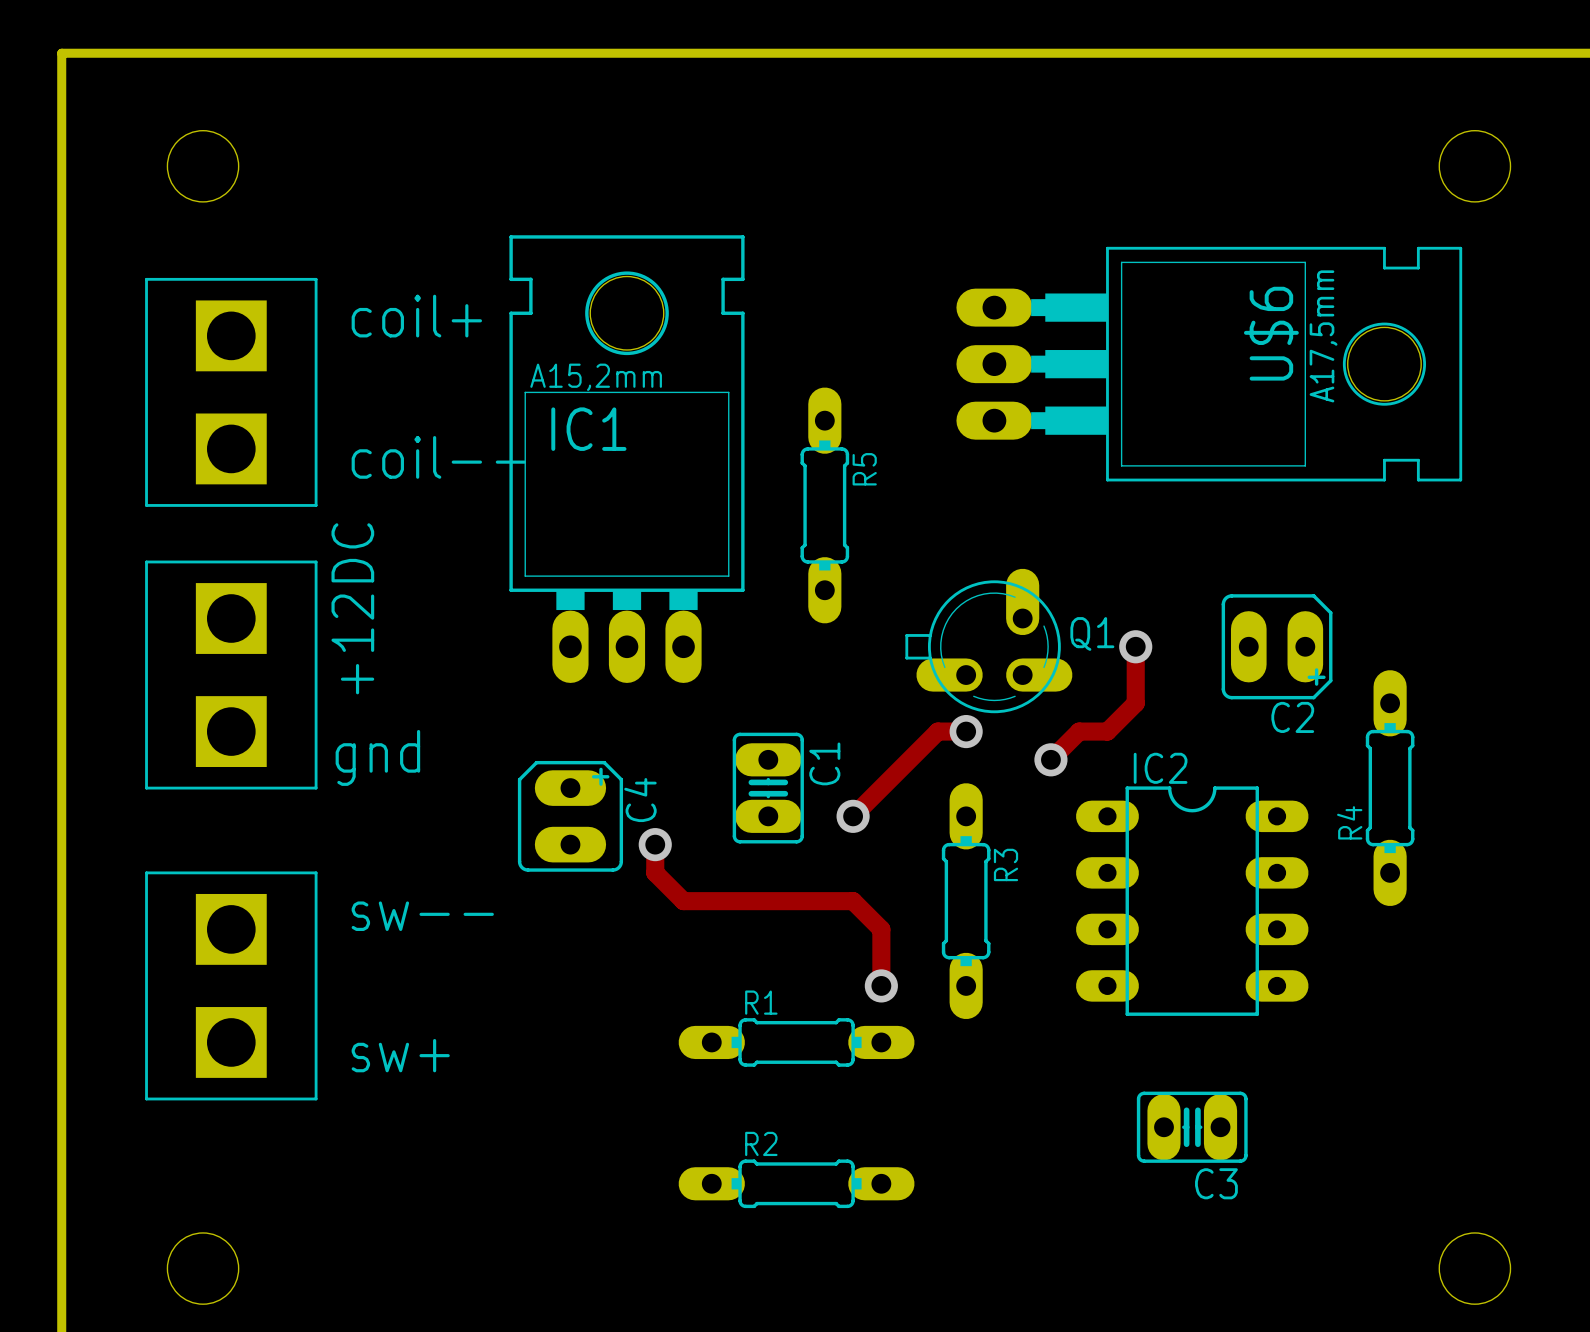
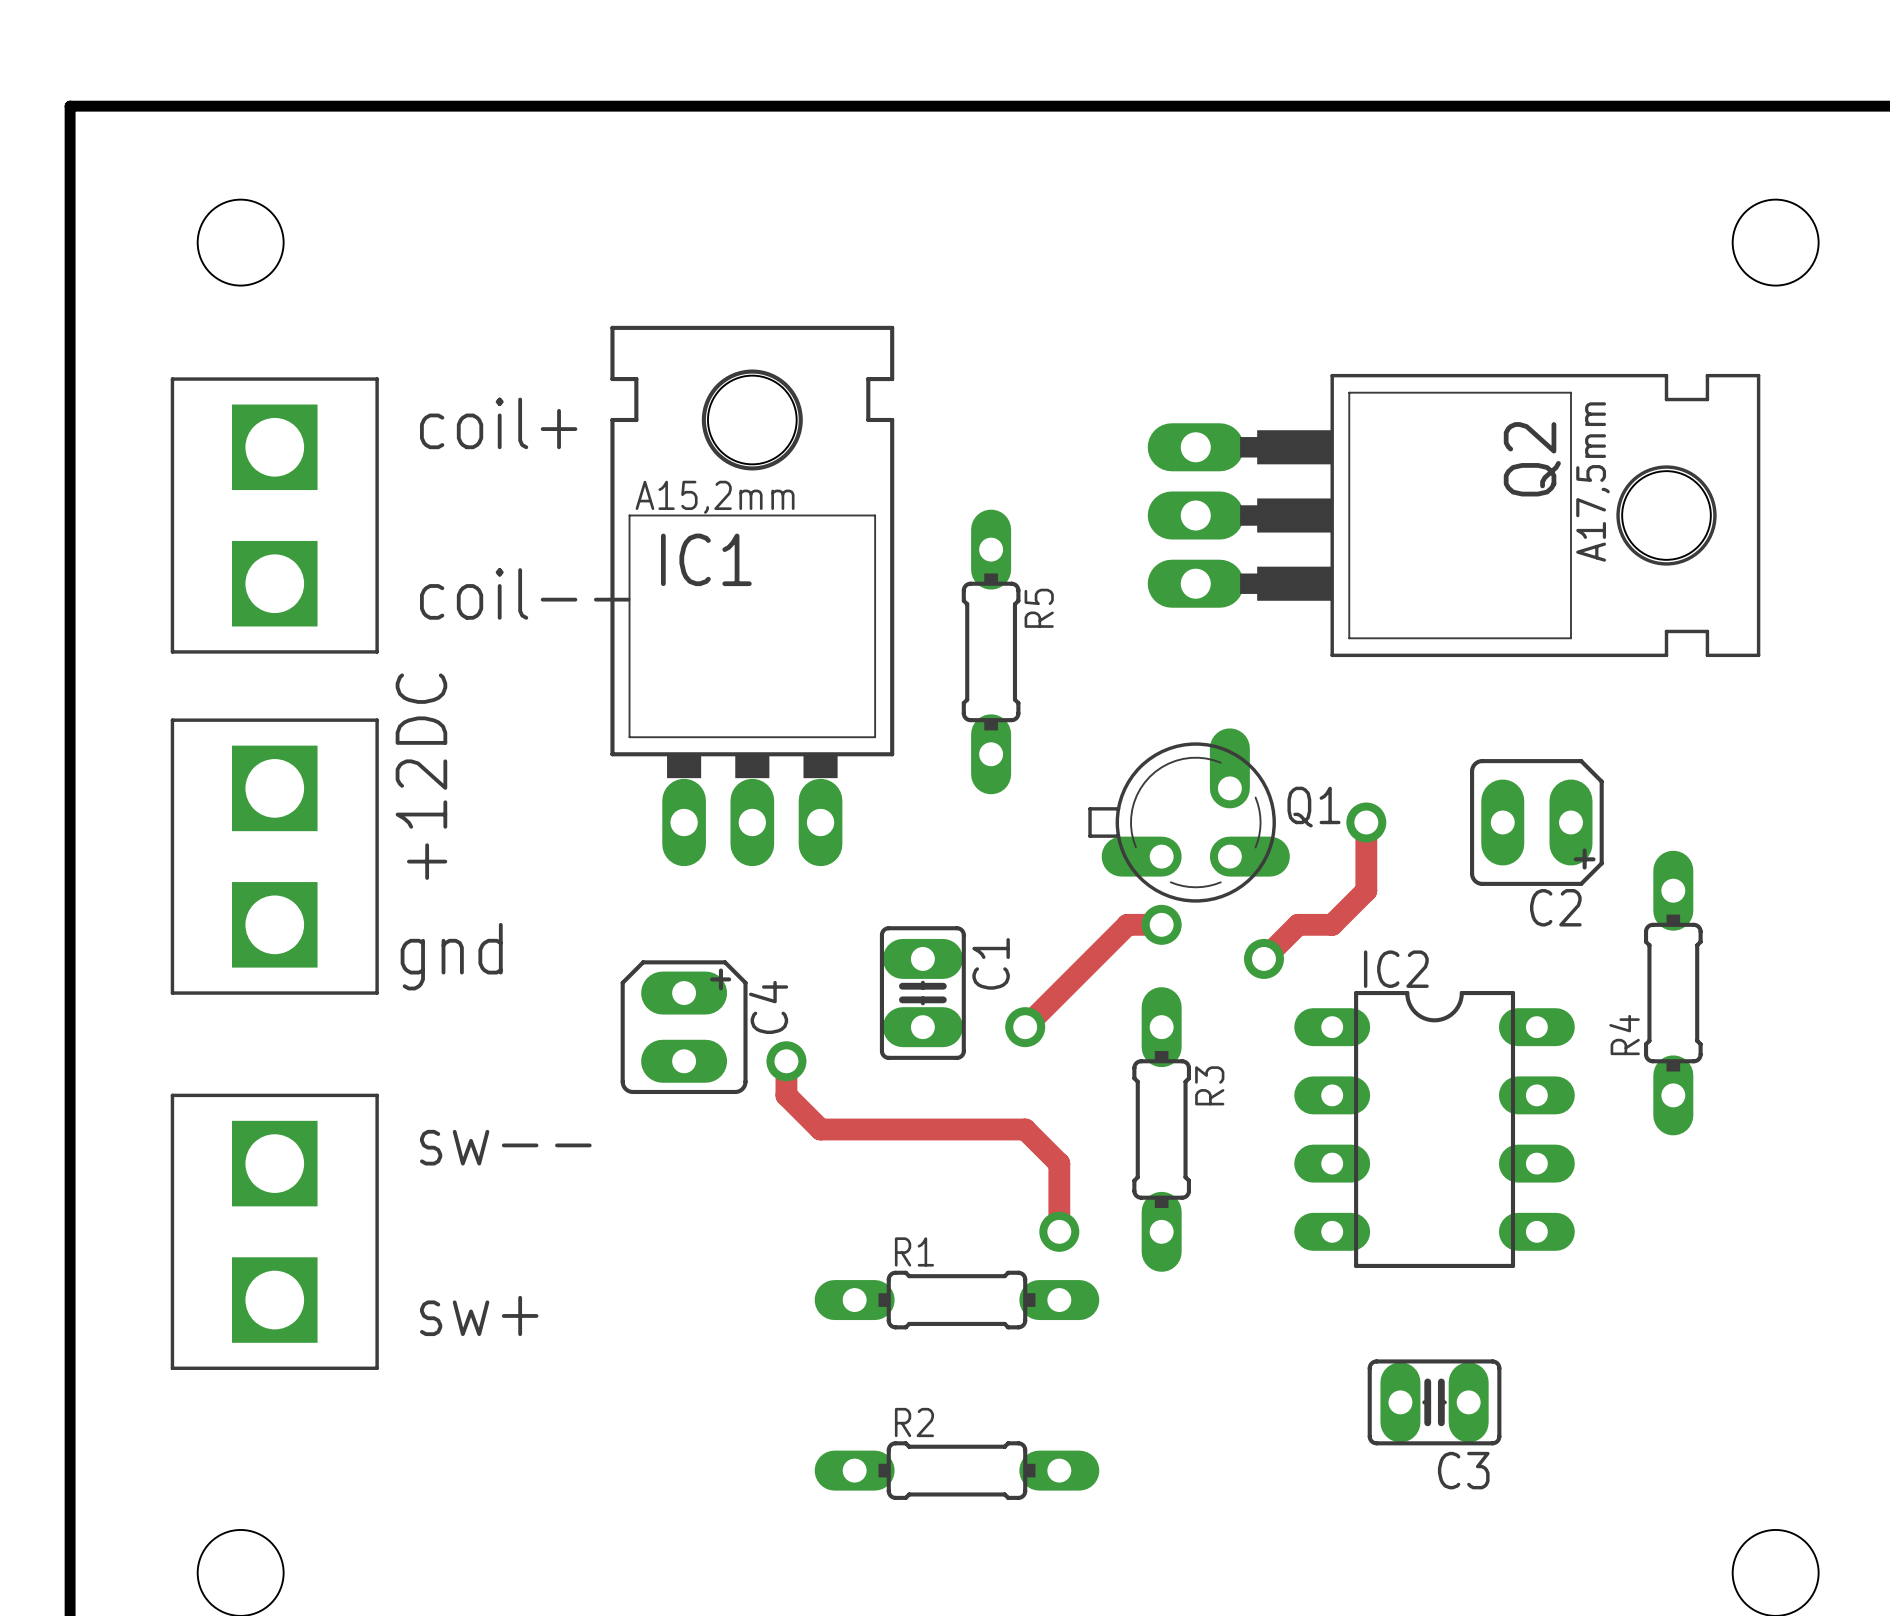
U$6: (1209, 364) -> none
Q2: none -> (1454, 515)

